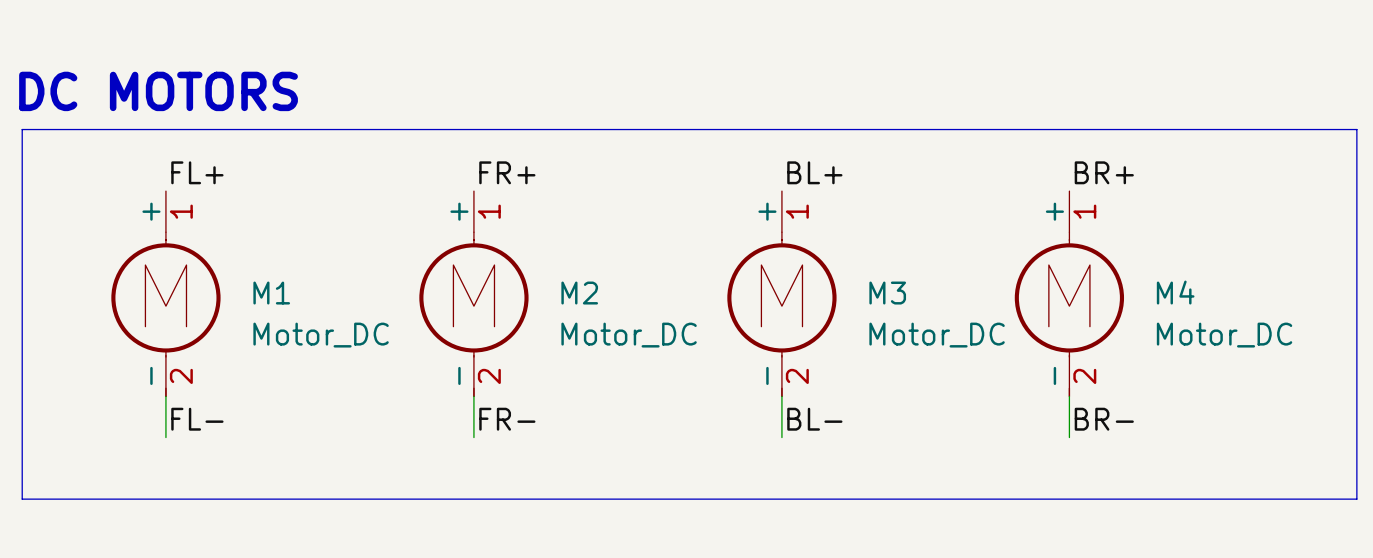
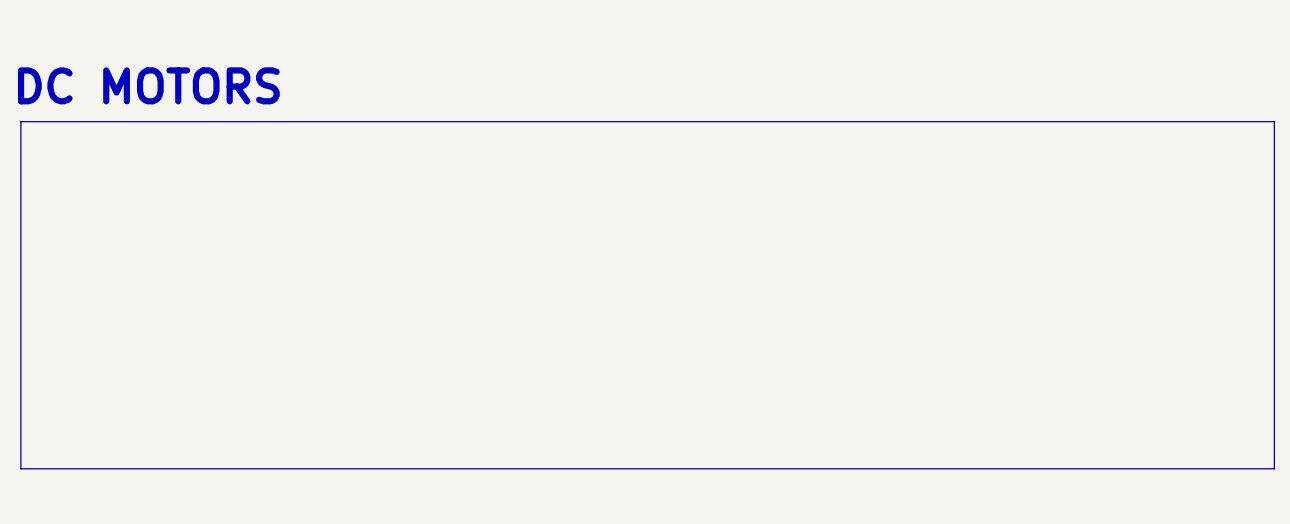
label: FL+ (197, 172) -> none
label: FR+ (507, 172) -> none
label: BL+ (814, 172) -> none
label: BR+ (1104, 172) -> none
M1: Motor_DC (165, 293) -> none
M2: Motor_DC (473, 293) -> none
M3: Motor_DC (781, 293) -> none
M4: Motor_DC (1069, 293) -> none
wire: (165, 396) (165, 437) -> none
wire: (473, 396) (473, 437) -> none
wire: (781, 396) (781, 437) -> none
wire: (1069, 396) (1069, 437) -> none
label: FL- (197, 419) -> none
label: FR- (507, 419) -> none
label: BL- (814, 419) -> none
label: BR- (1104, 419) -> none

